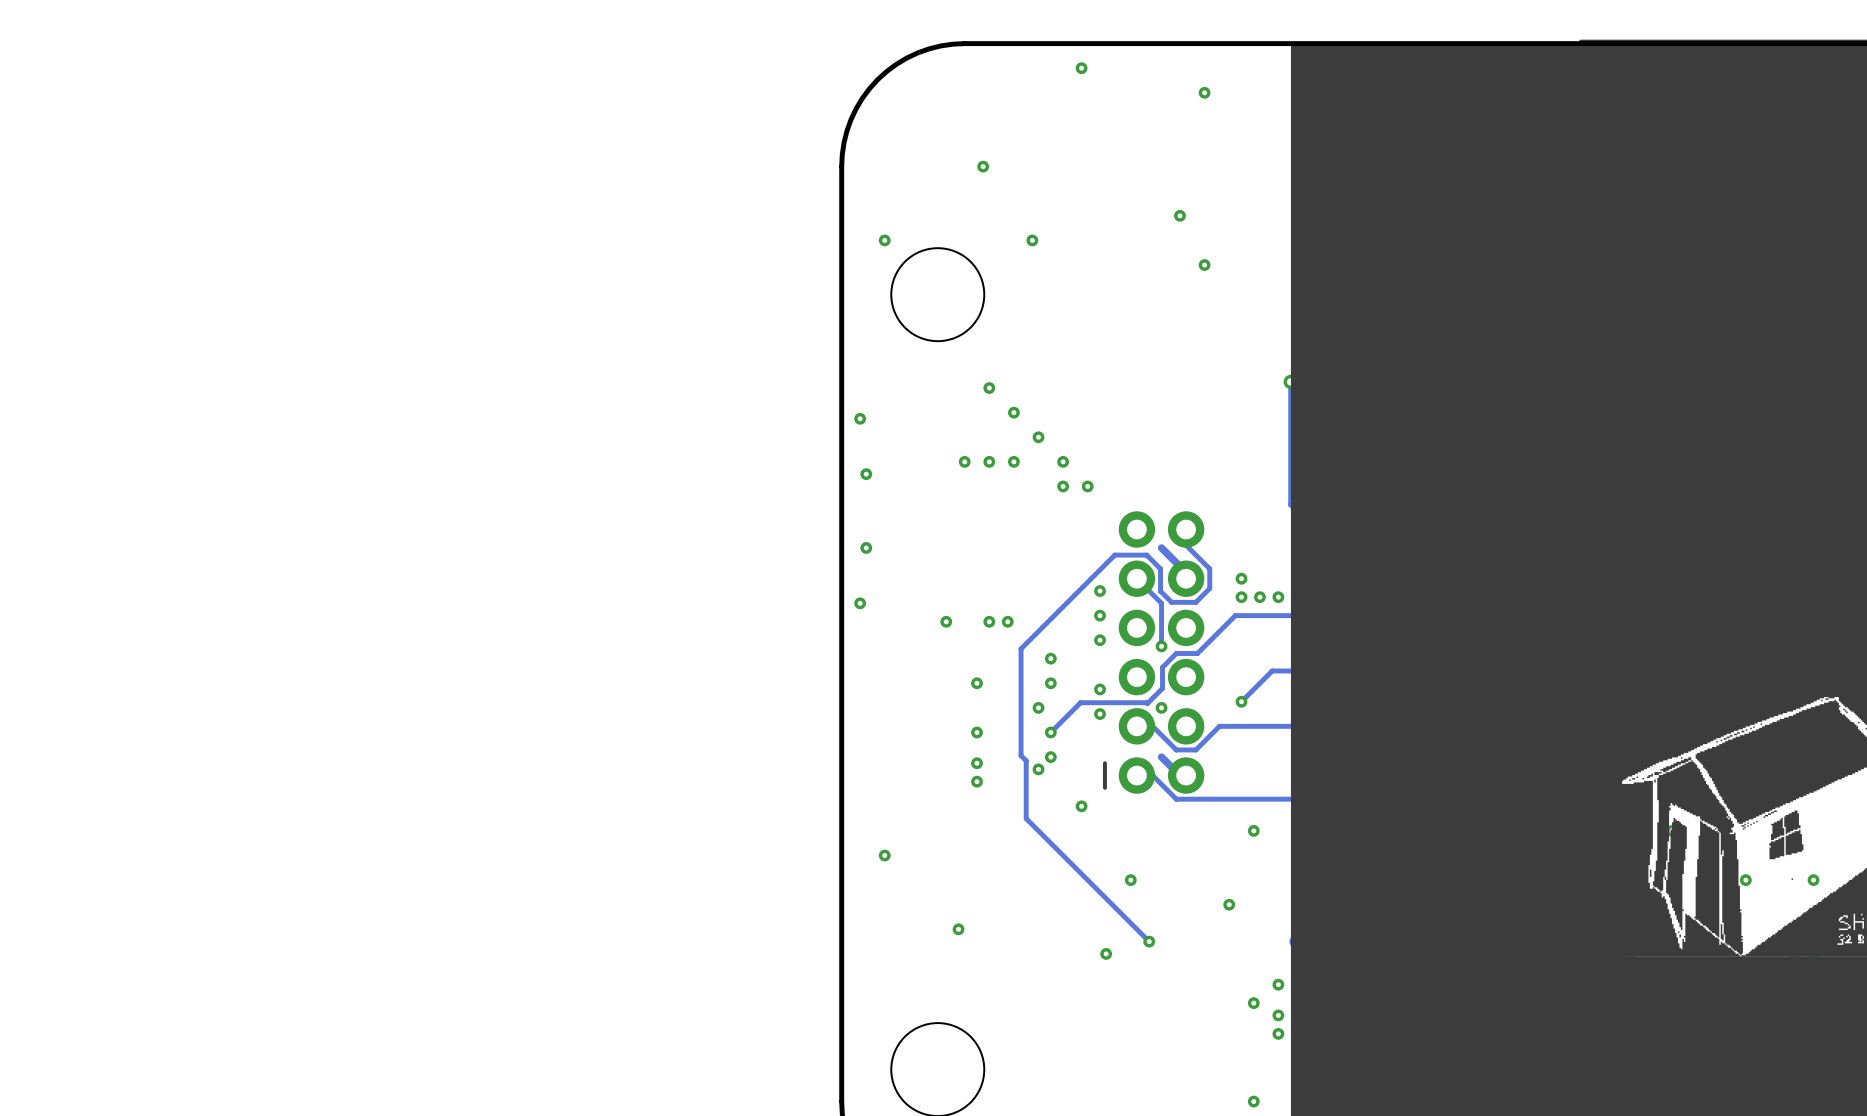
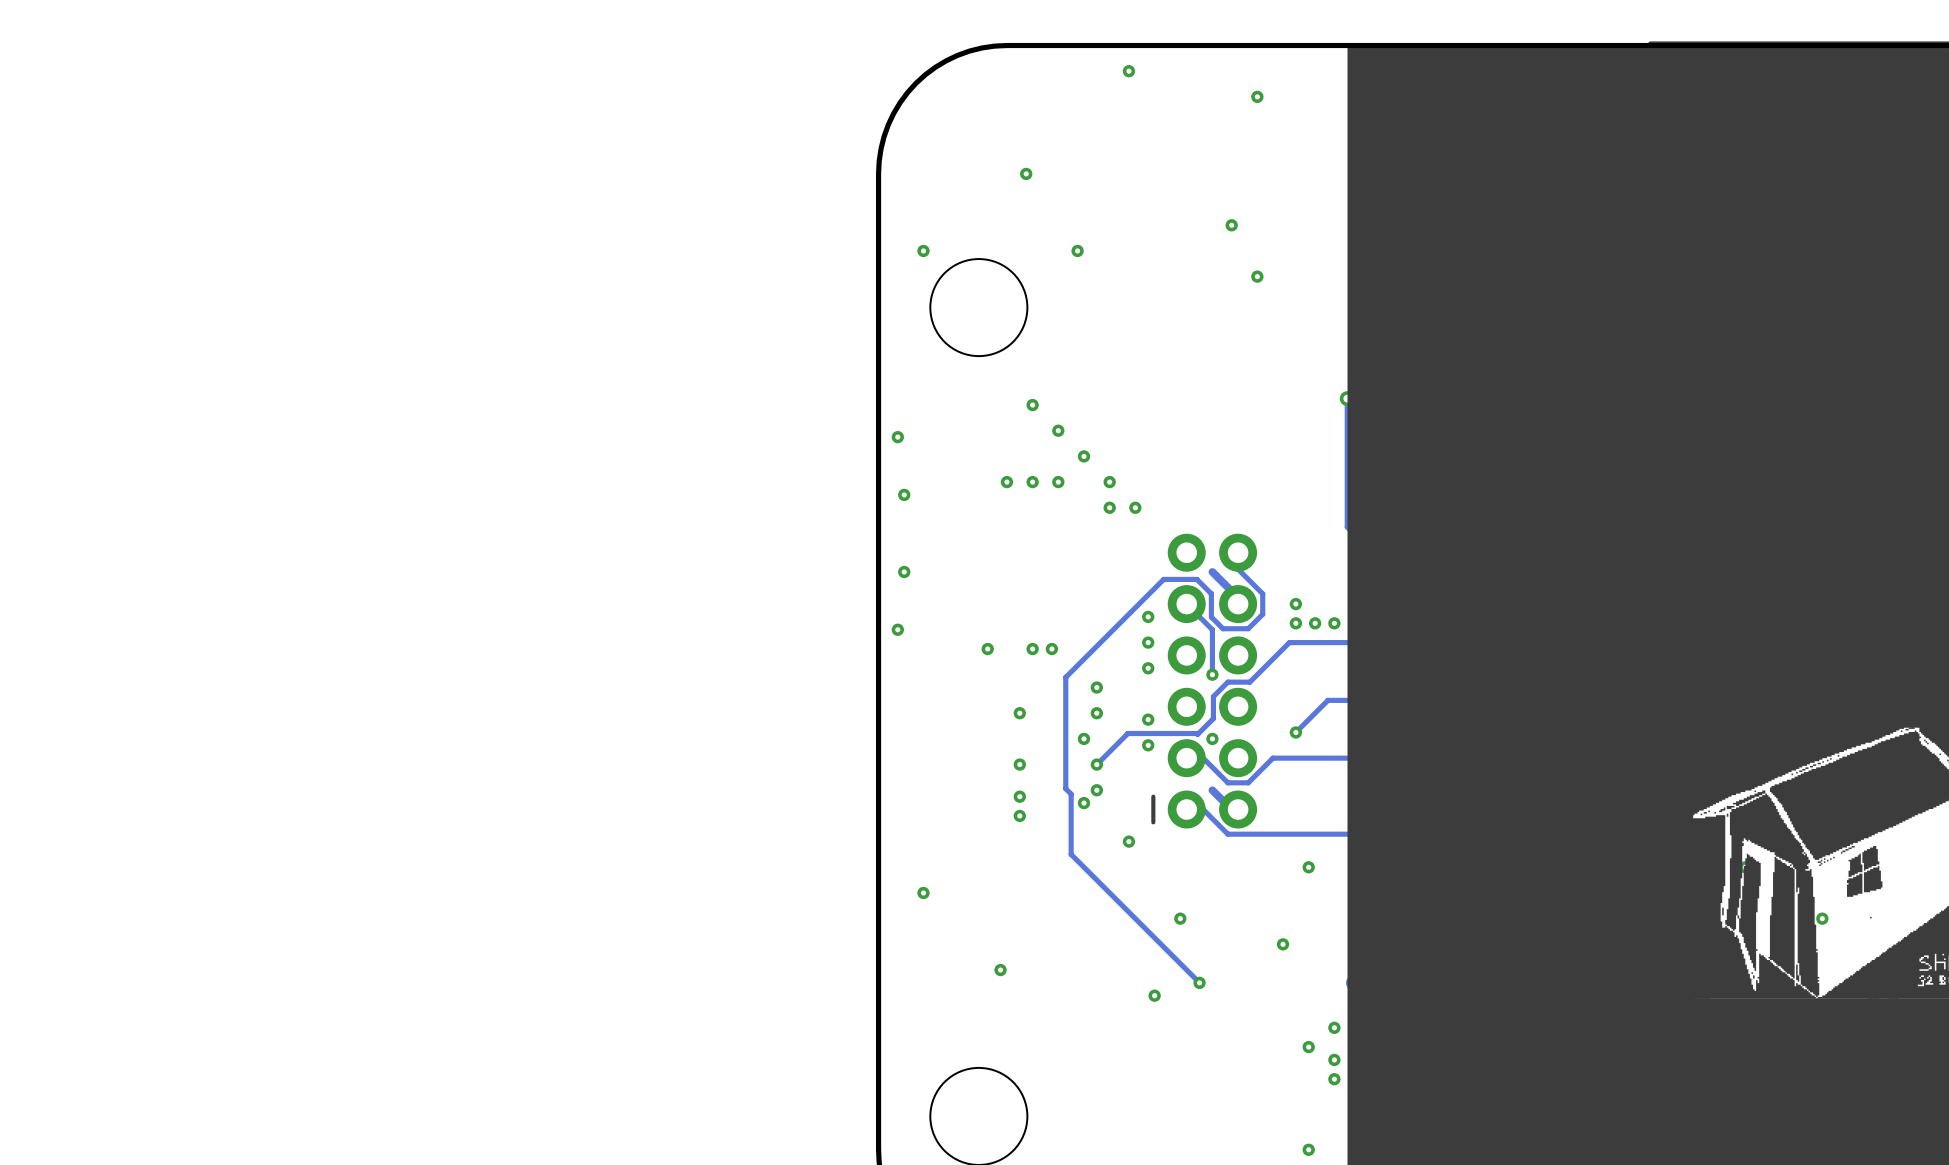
via: (1813, 880) -> none

